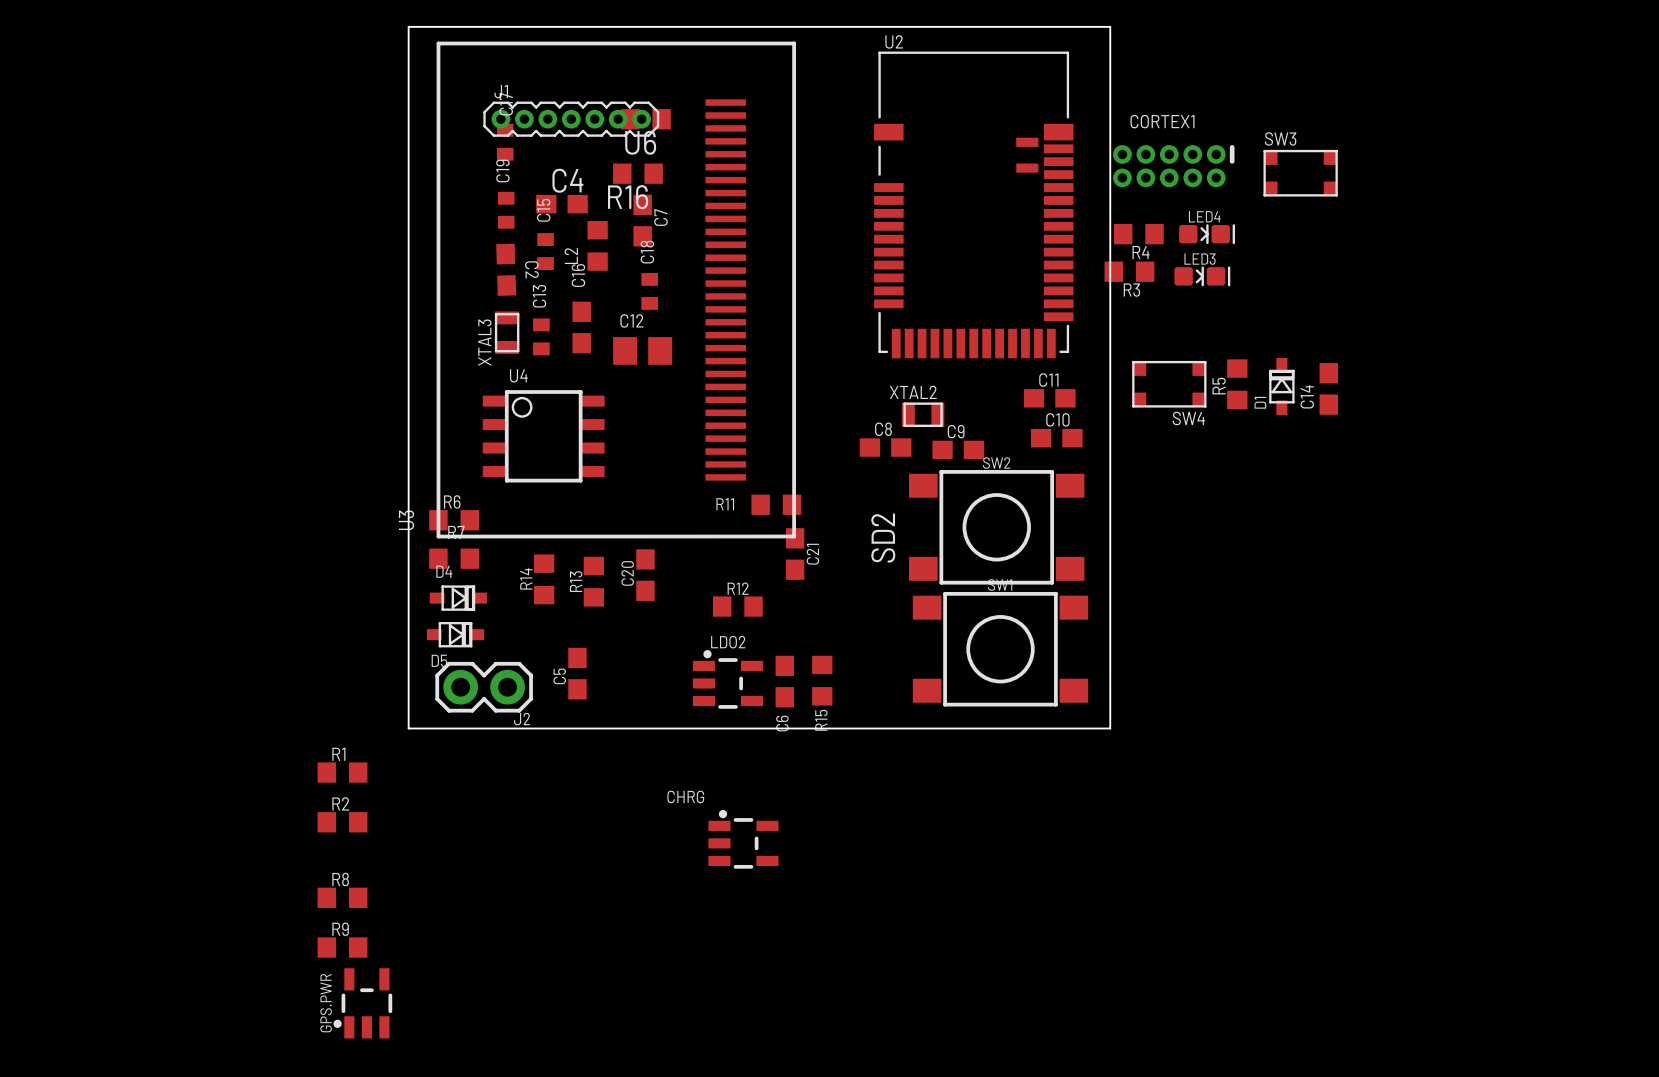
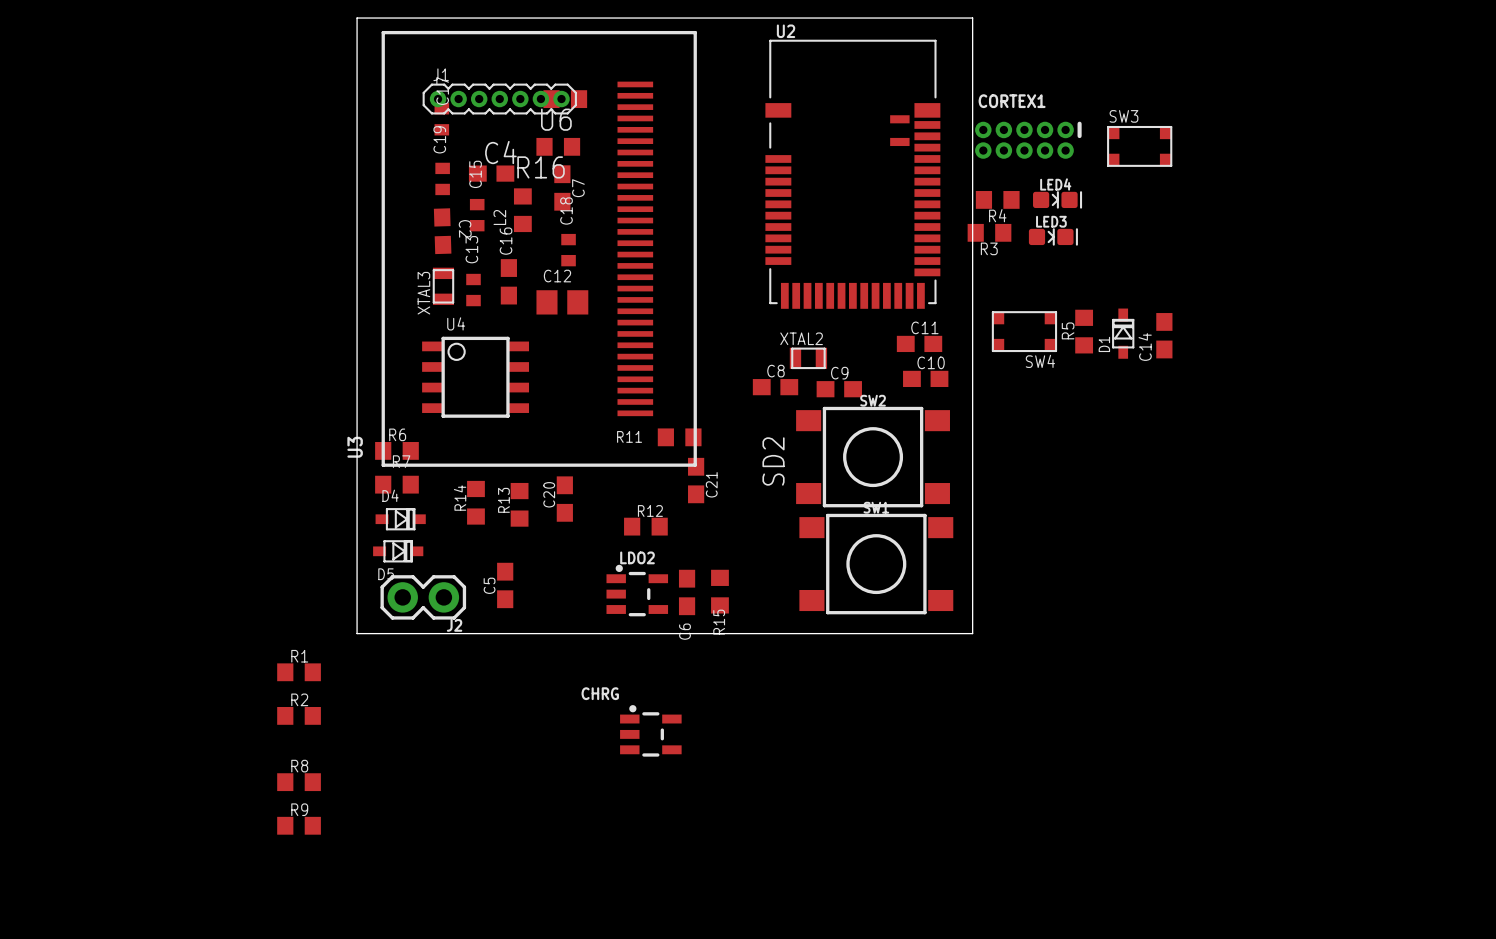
GPS.PWR: (362, 1003) -> none

